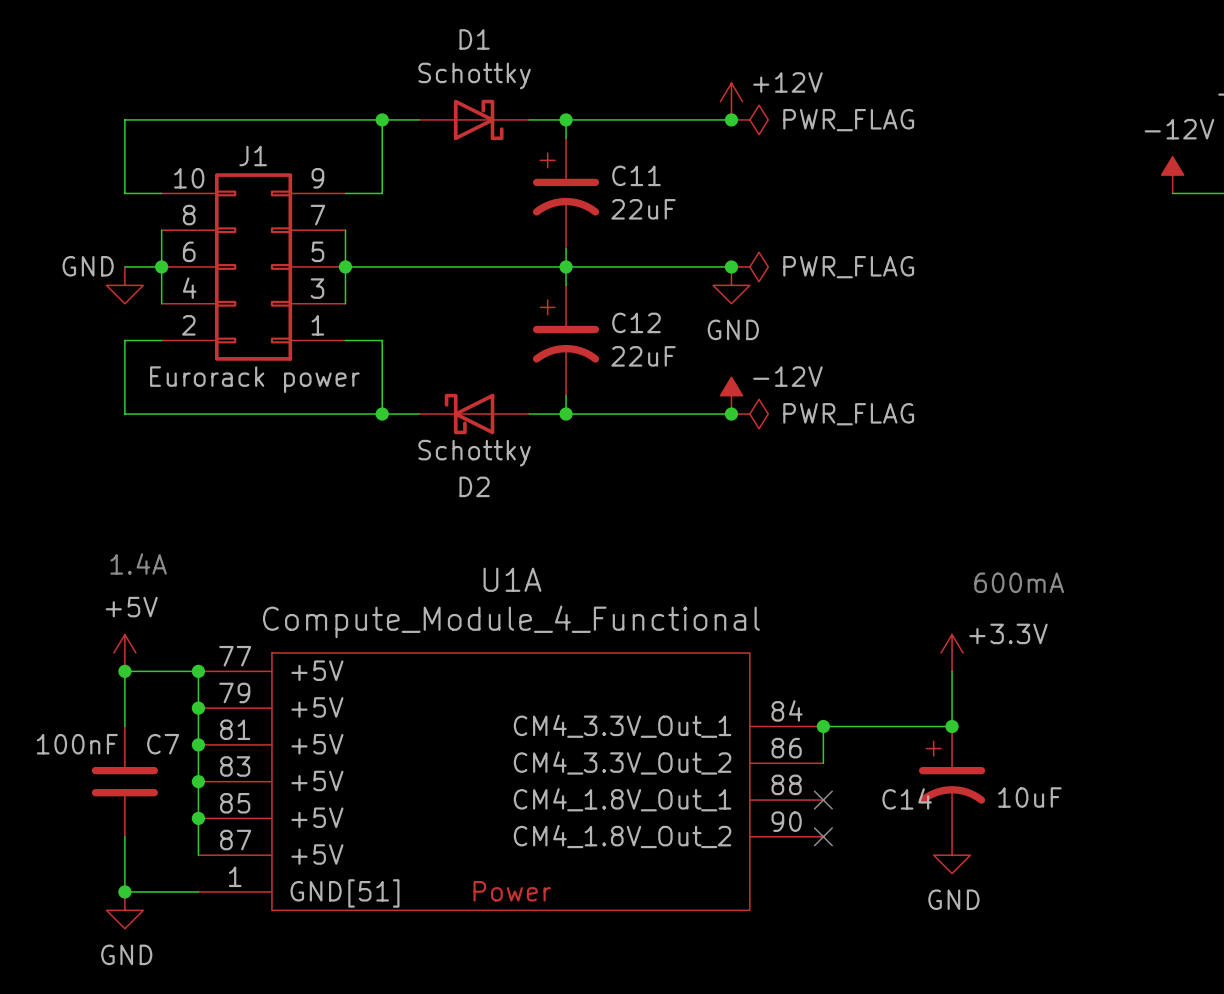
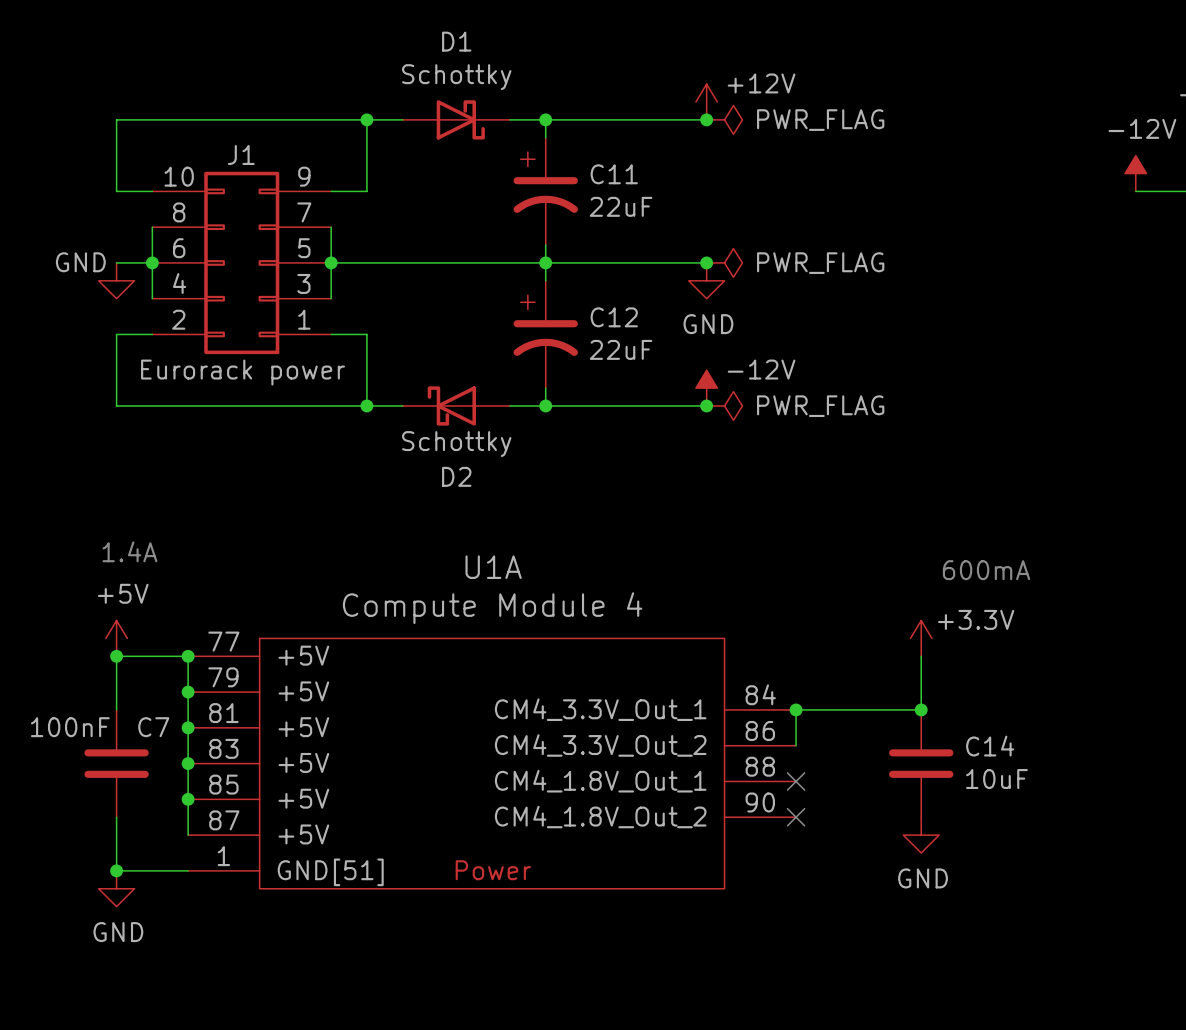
U1A value: Compute_Module_4_Functional (511, 621) -> Compute Module 4 (492, 608)
C14 symbol: [918, 726, 986, 837] -> [889, 709, 954, 818]
C14 name position: C14 (907, 798) -> C14 (990, 746)

